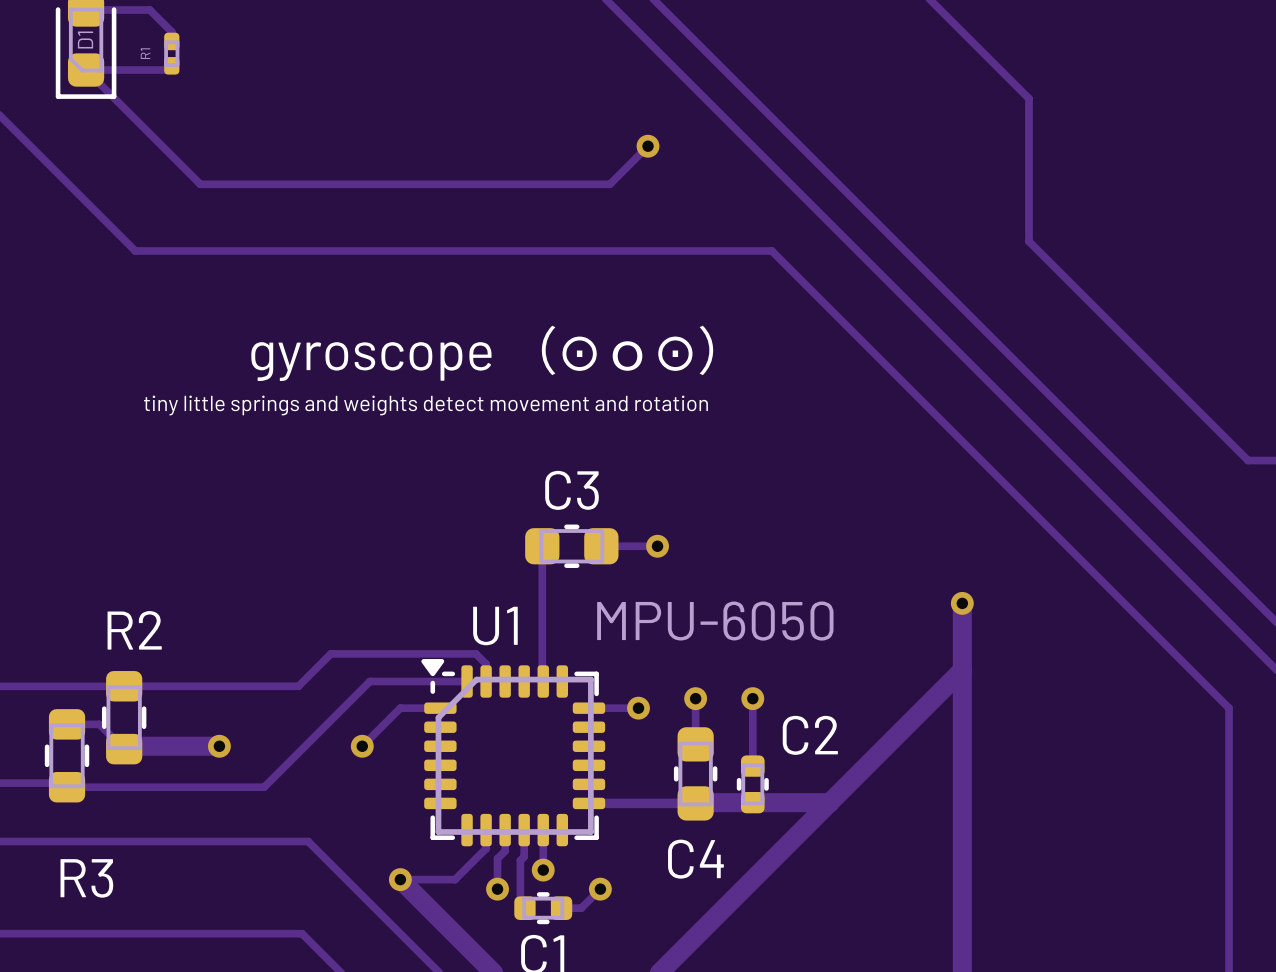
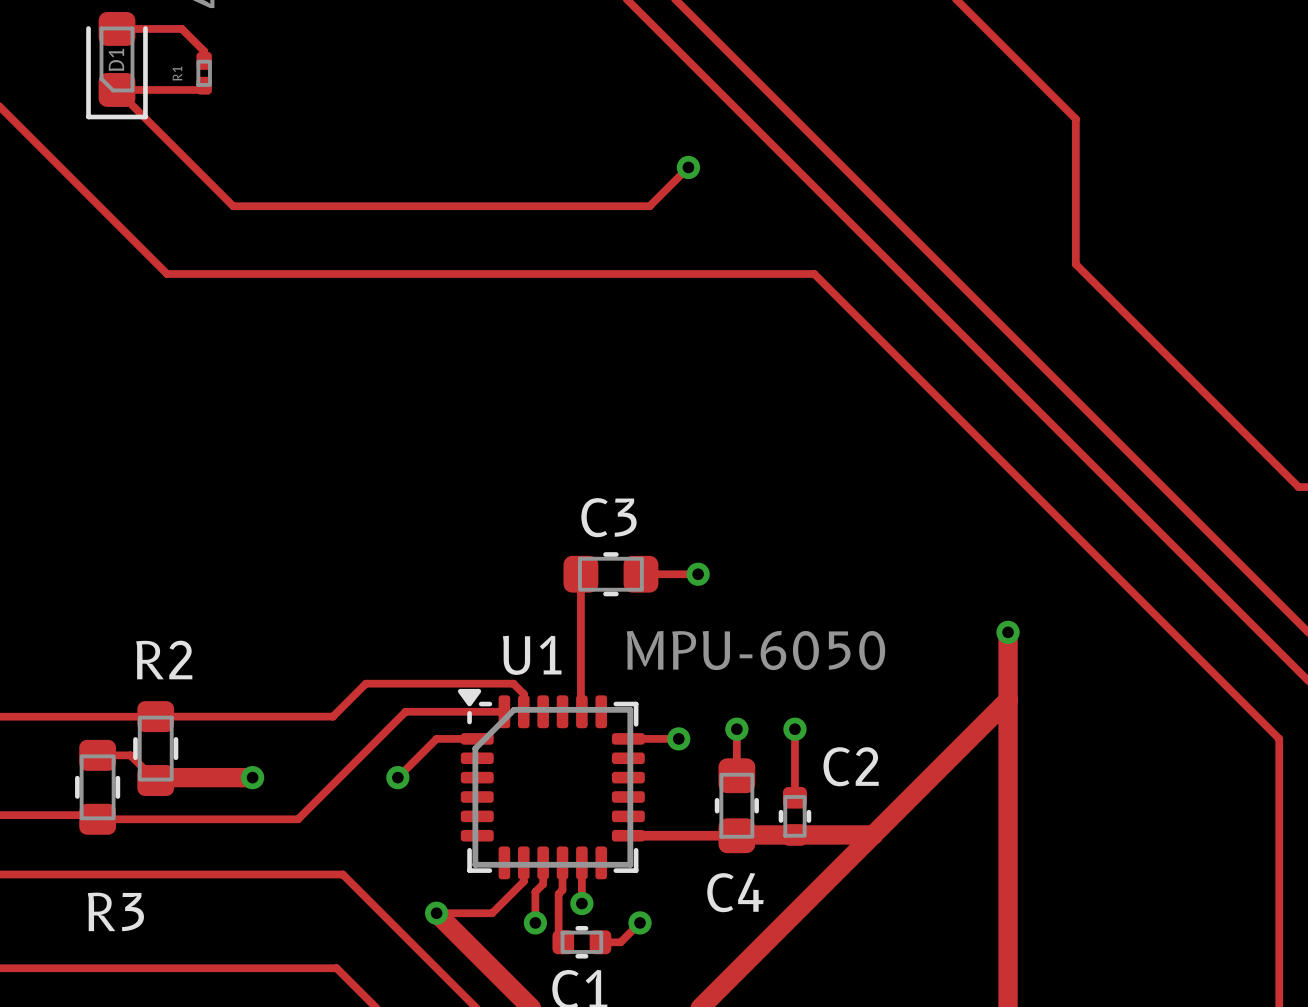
text: gyroscope （⊙ｏ⊙） (482, 353) -> none
text: tiny little springs and weights detect movement and rotation (425, 405) -> none

